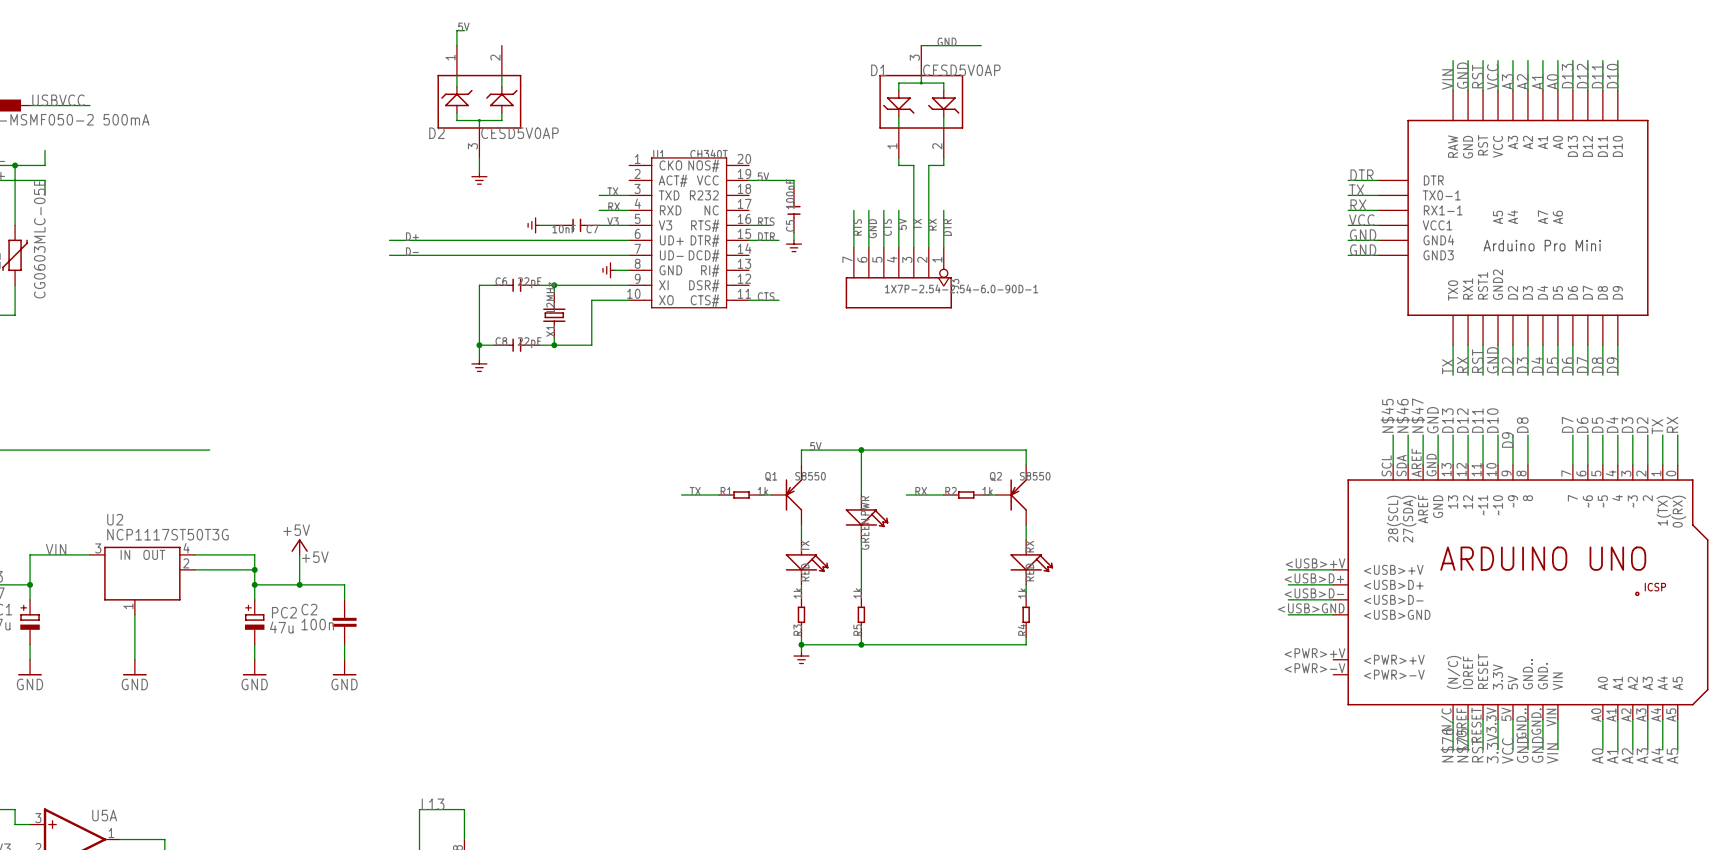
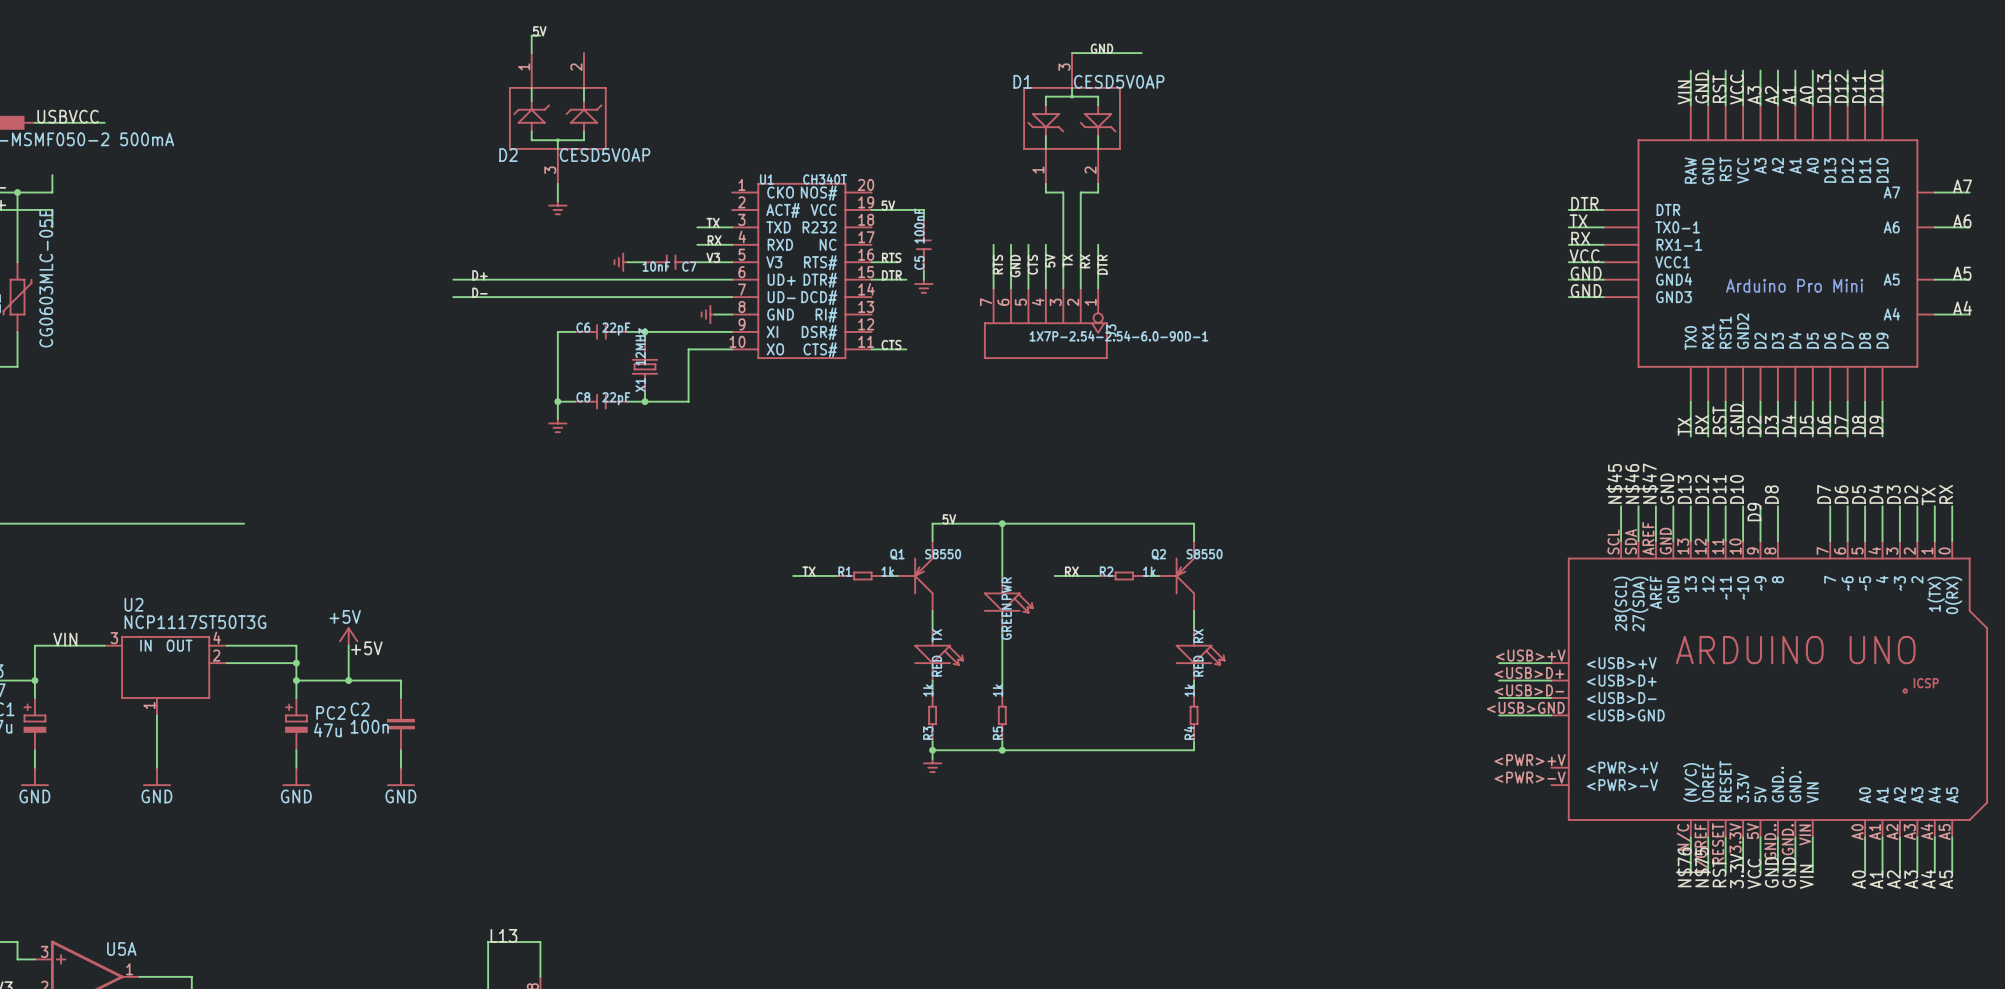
label: none -> A7 (1962, 186)
wire: none -> (1934, 192) (1969, 192)
label: none -> A6 (1962, 221)
wire: none -> (1934, 227) (1969, 227)
part: (1513, 217) -> none
part: none -> (1769, 253)
label: none -> A5 (1962, 273)
wire: none -> (1934, 279) (1969, 279)
label: none -> A4 (1962, 308)
wire: none -> (1934, 314) (1969, 314)

